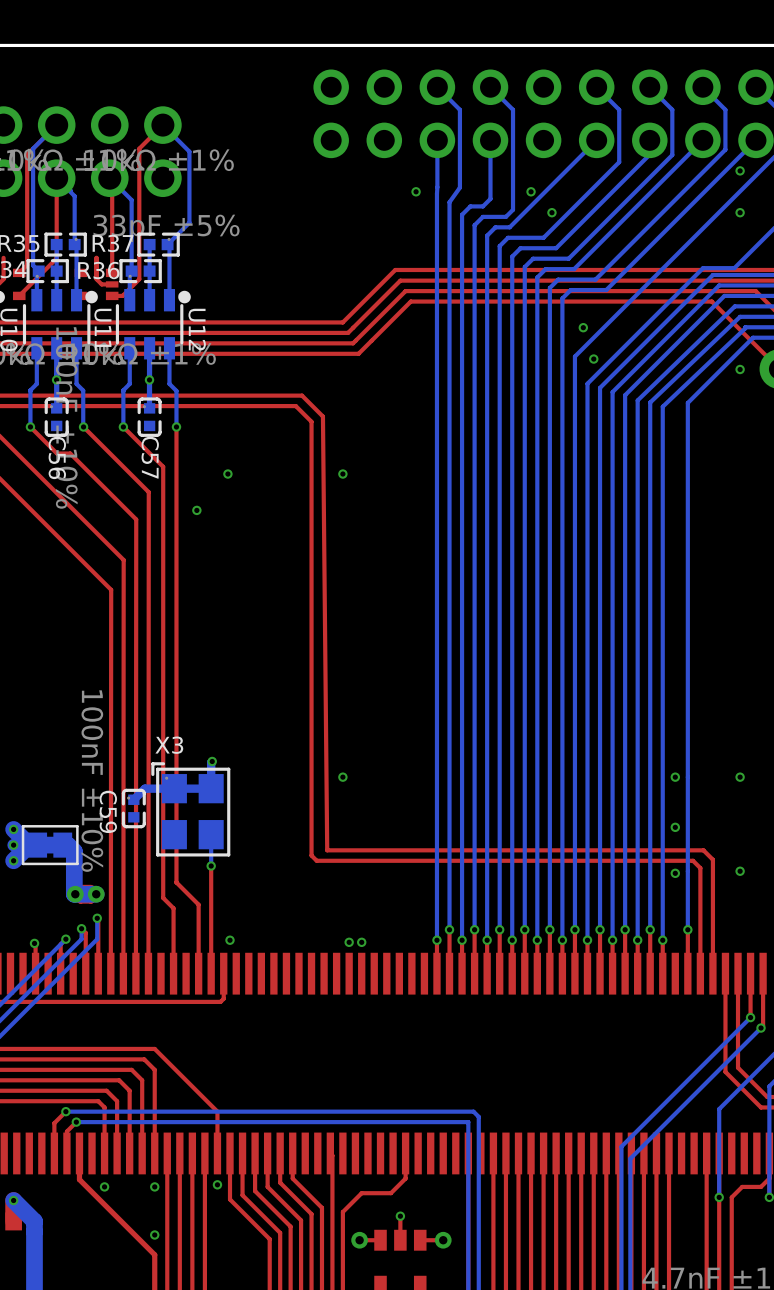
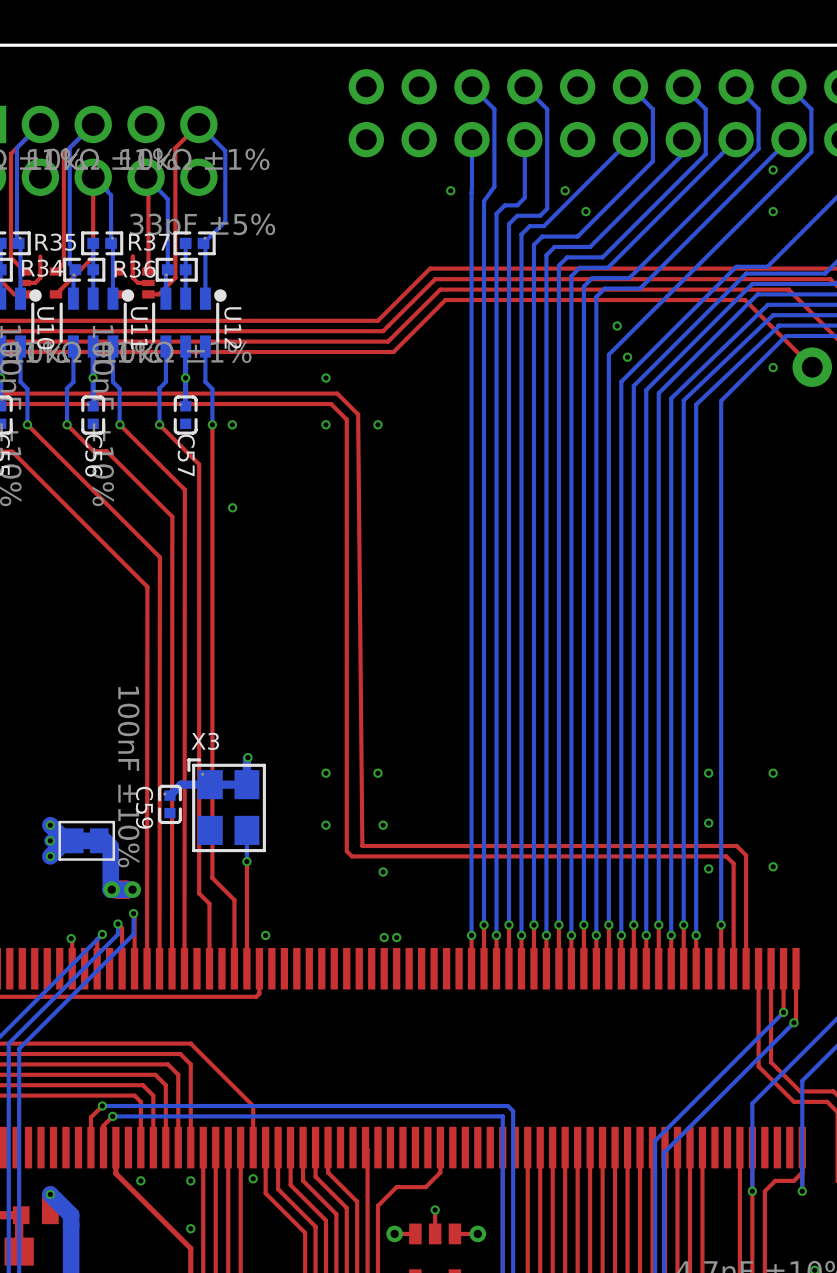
via: none -> (325, 378)
via: none -> (232, 424)
via: none -> (325, 424)
via: none -> (377, 424)
via: (227, 474) -> none
via: (342, 474) -> none
via: none -> (325, 773)
via: none -> (325, 825)
via: none -> (383, 825)
via: none -> (383, 872)

